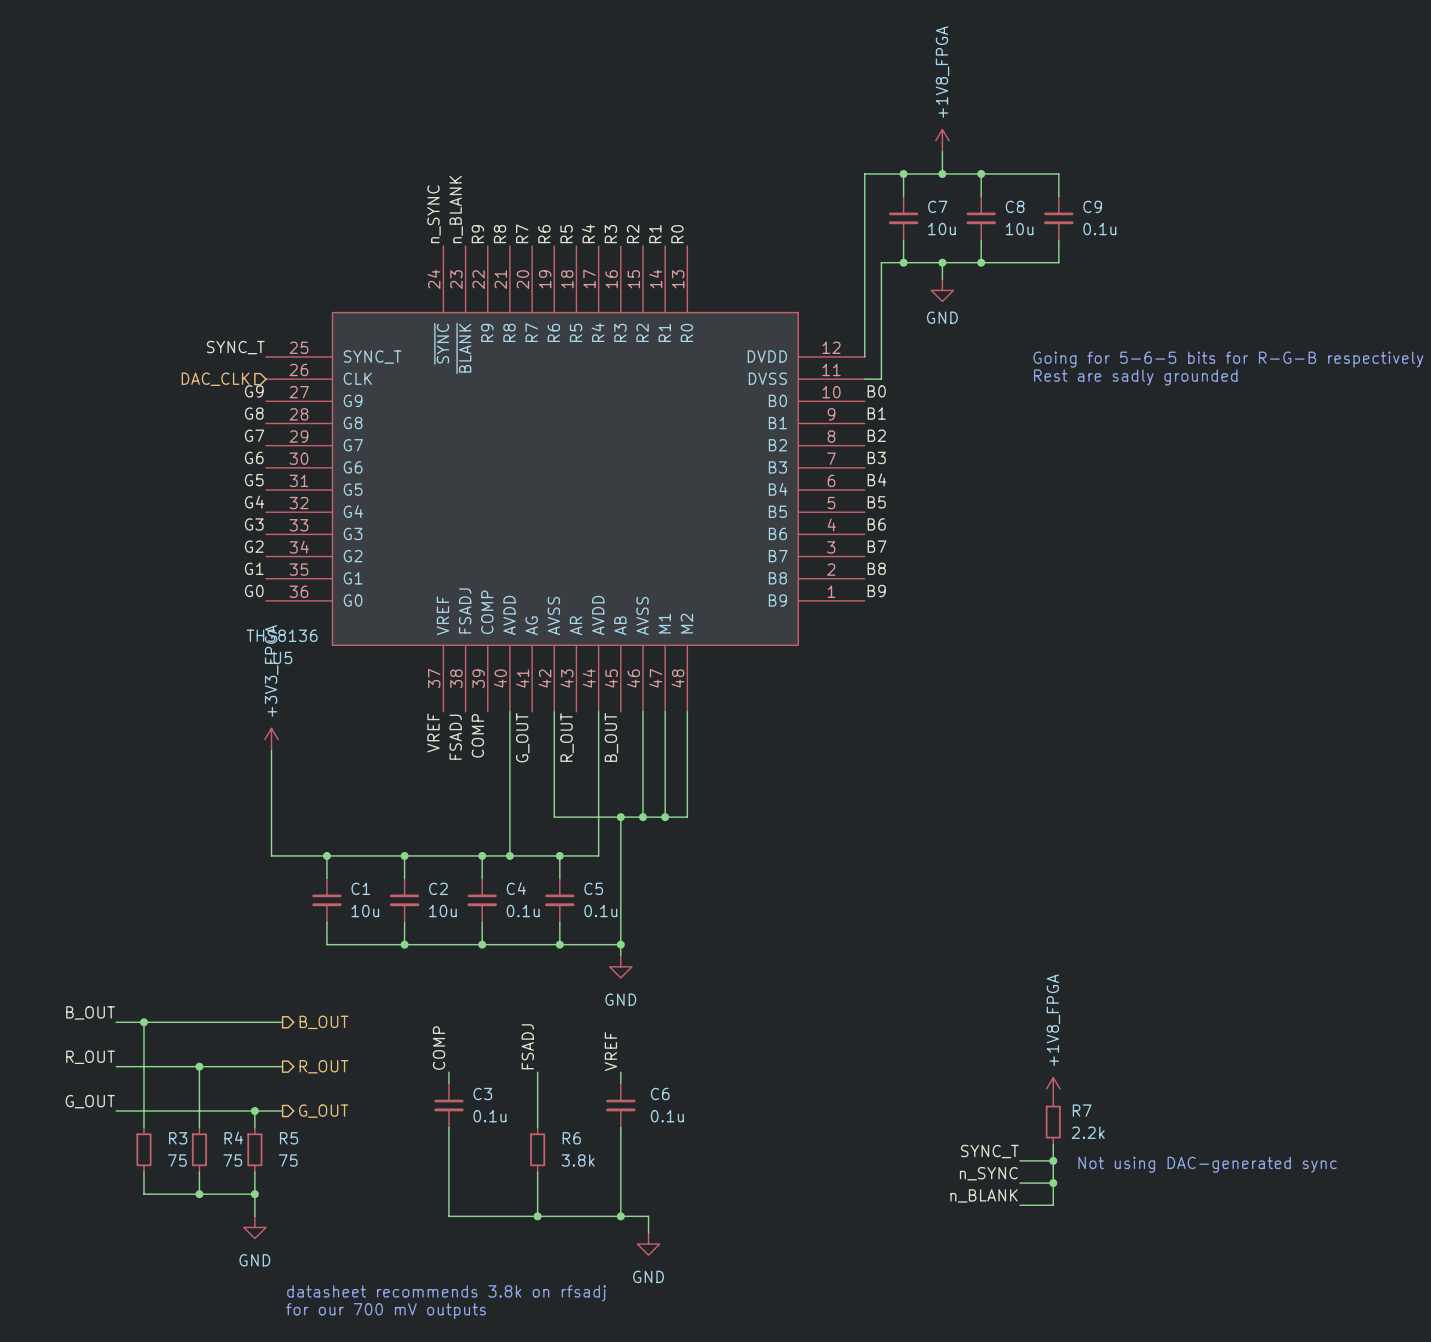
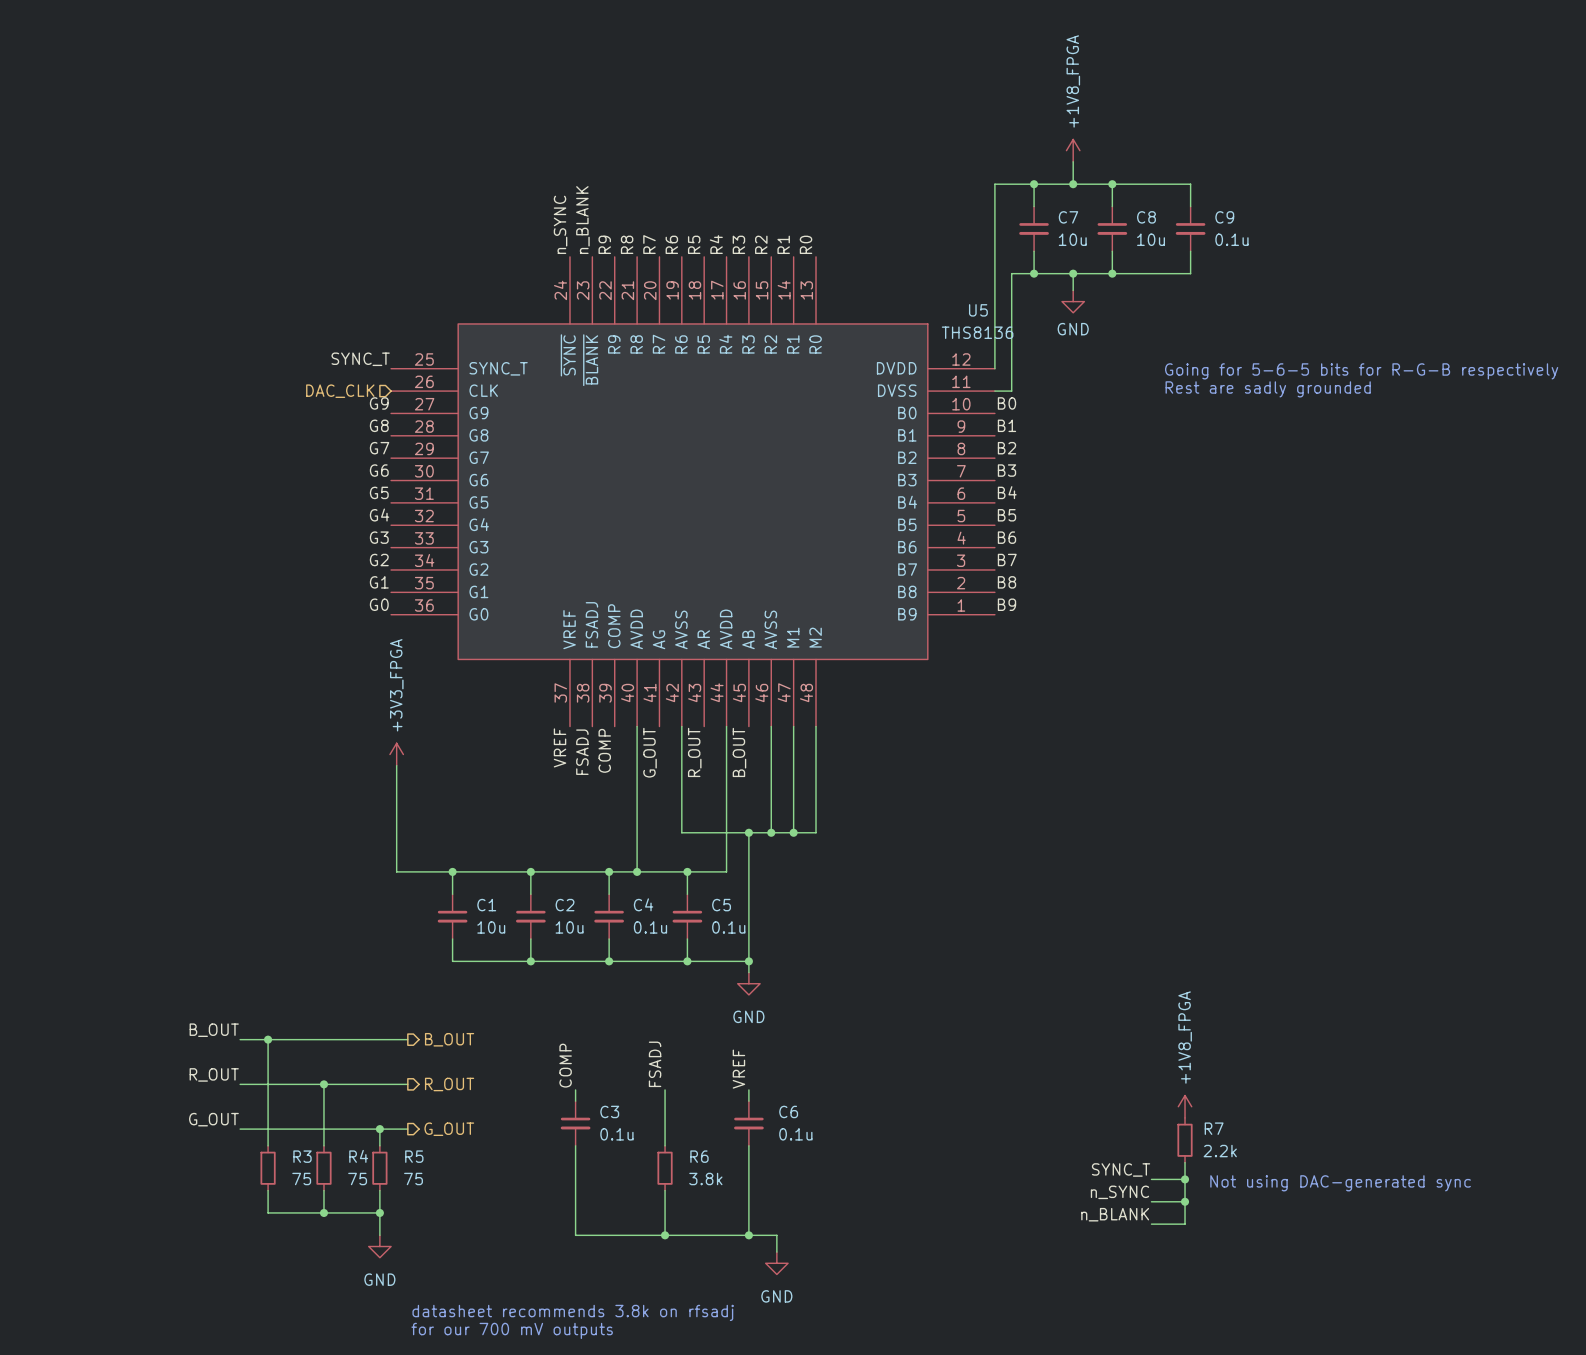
U5 value position: THS8136 (282, 635) -> THS8136 (977, 332)
U5 name position: U5 (282, 657) -> U5 (978, 310)

